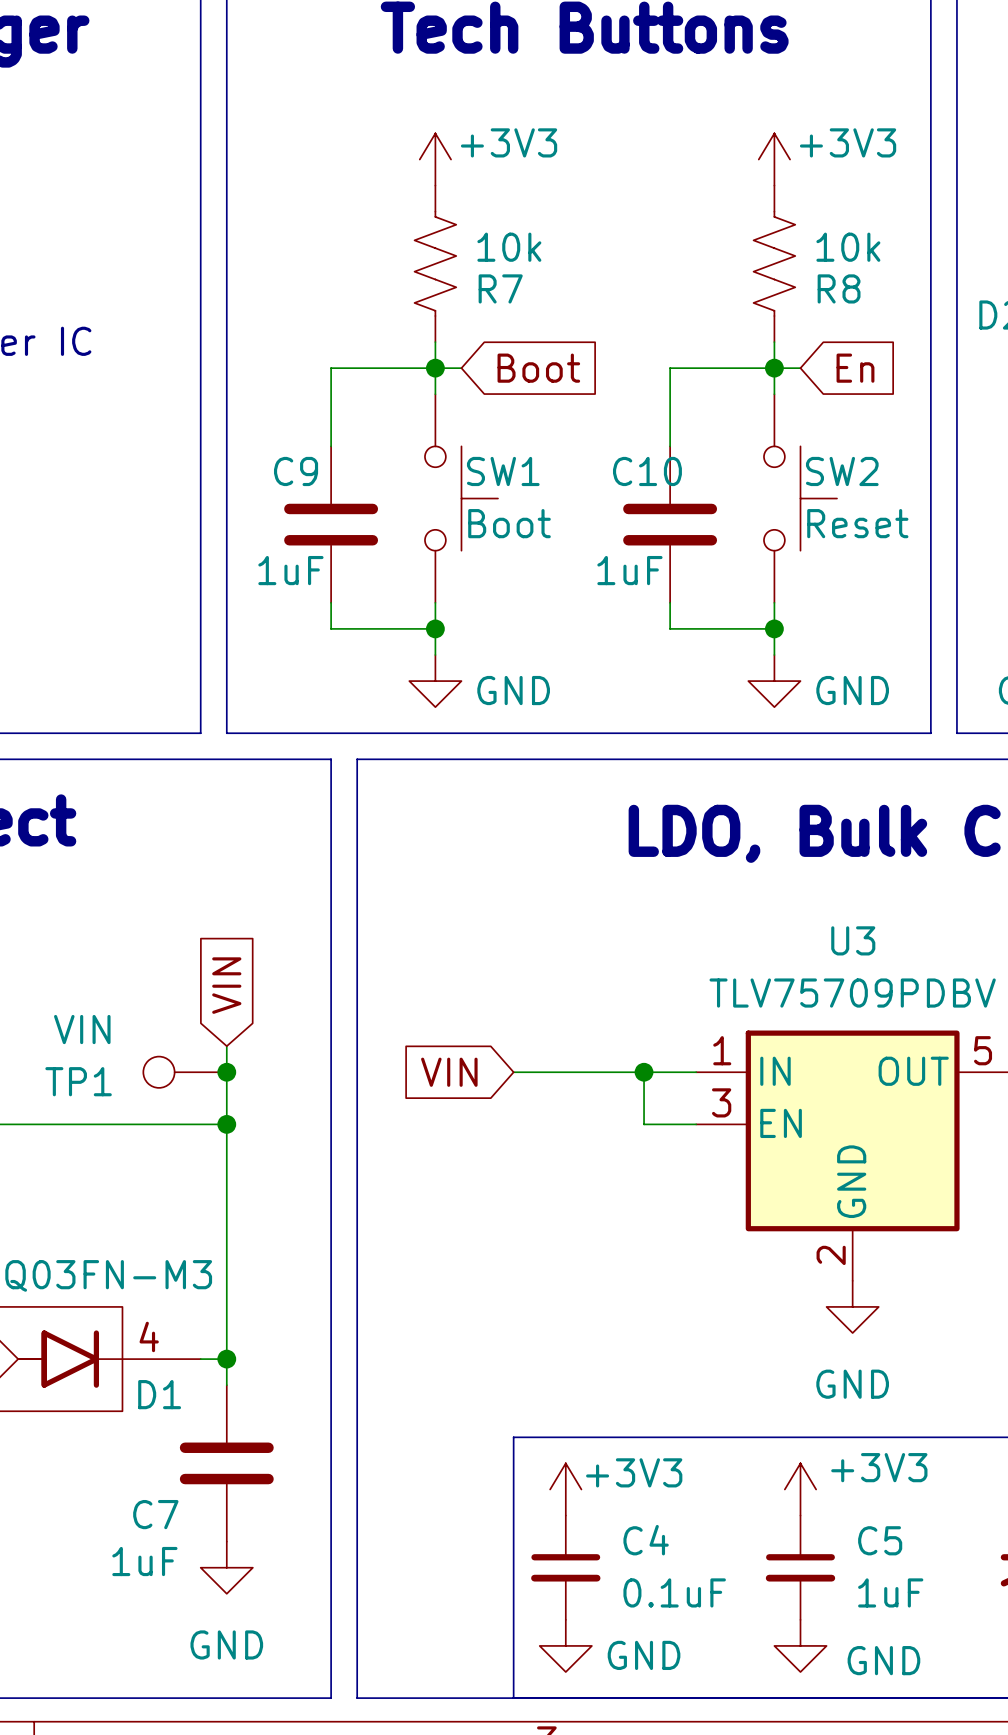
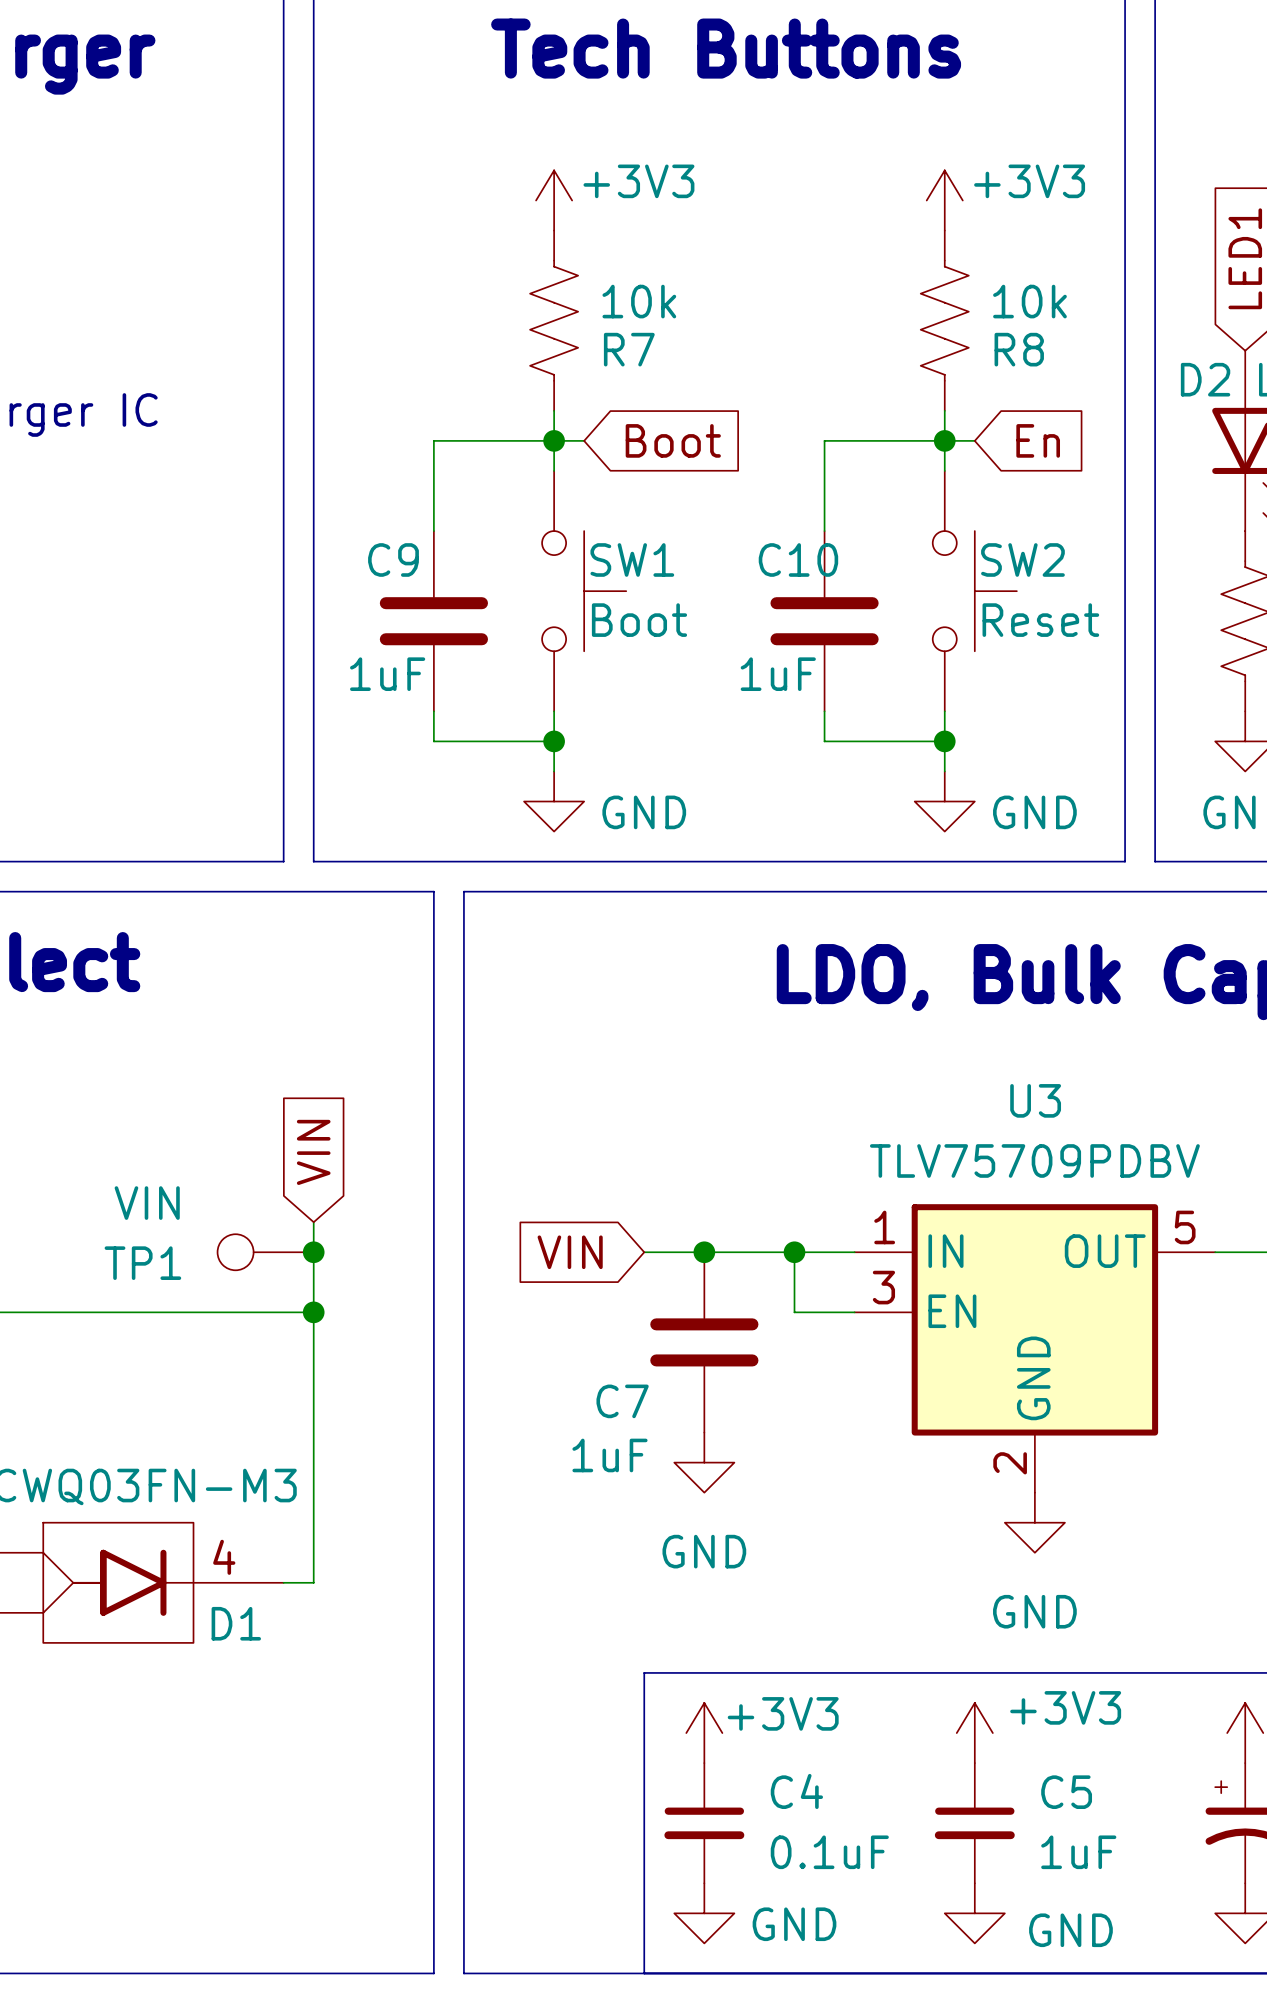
junction: none -> (704, 1252)
wire: (226, 1359) (226, 1385) -> none
junction: (226, 1359) -> none
C7 position: (226, 1463) -> (704, 1342)
power symbol position: GND (226, 1567) -> GND (704, 1462)

